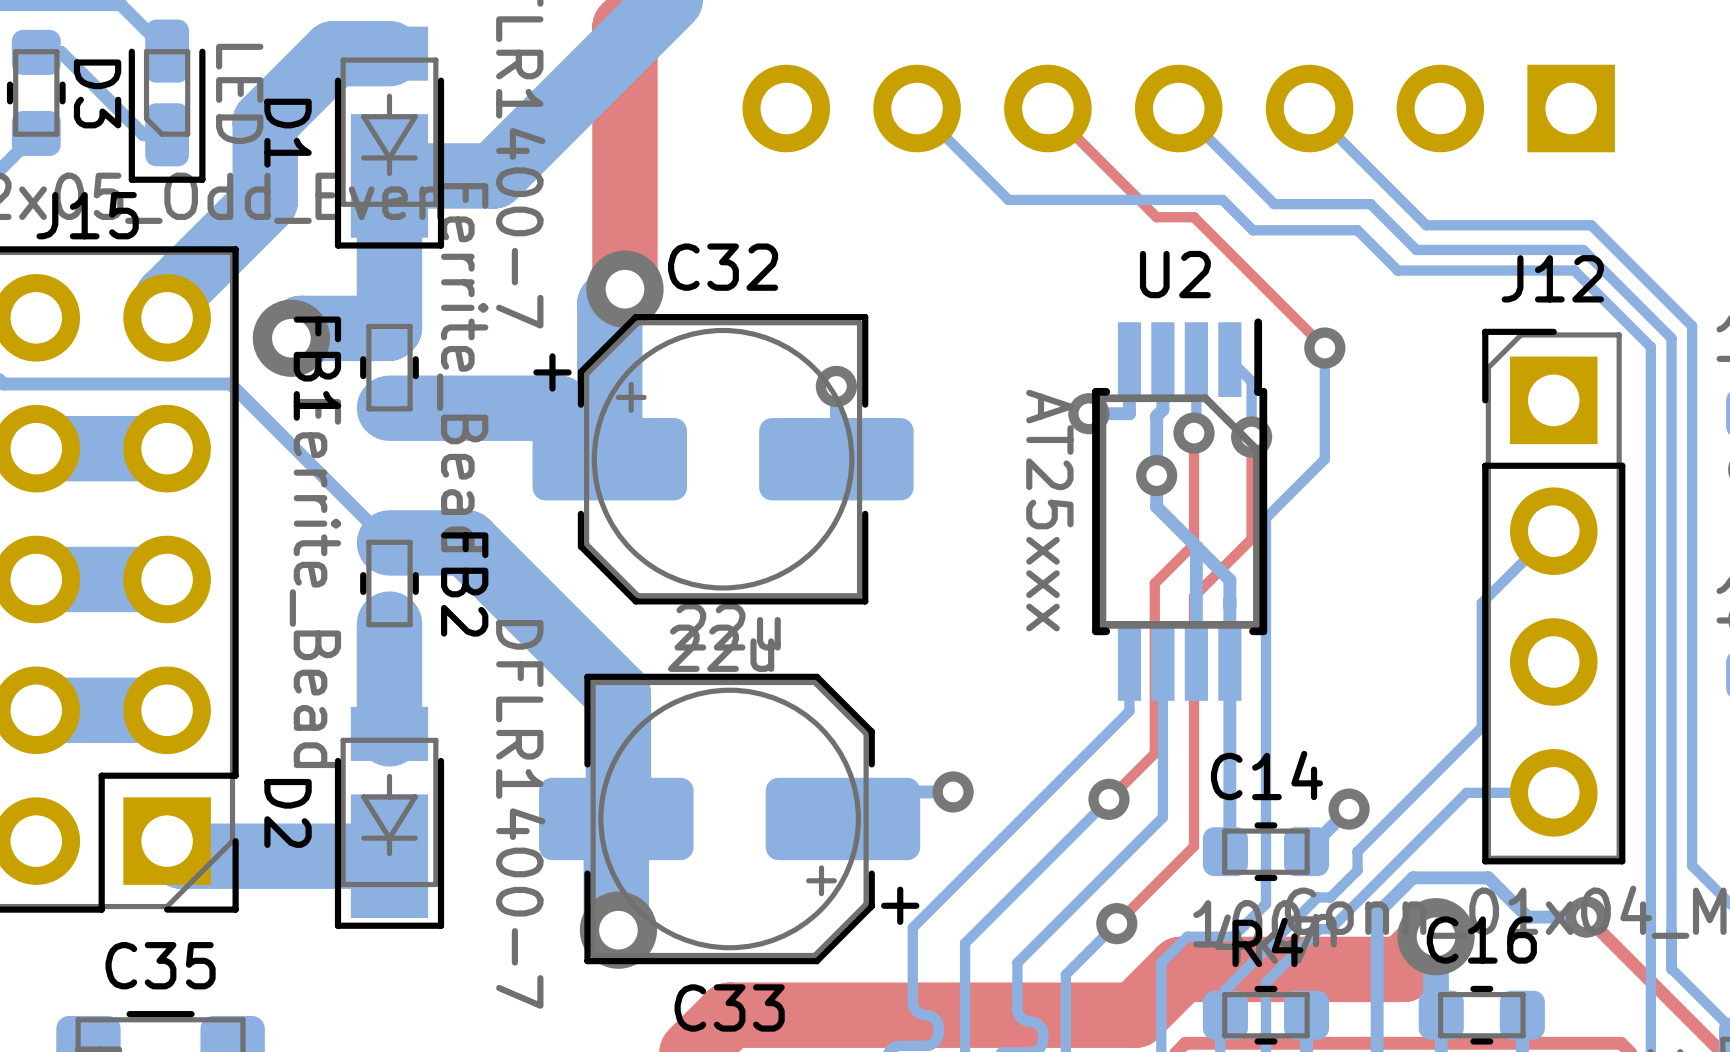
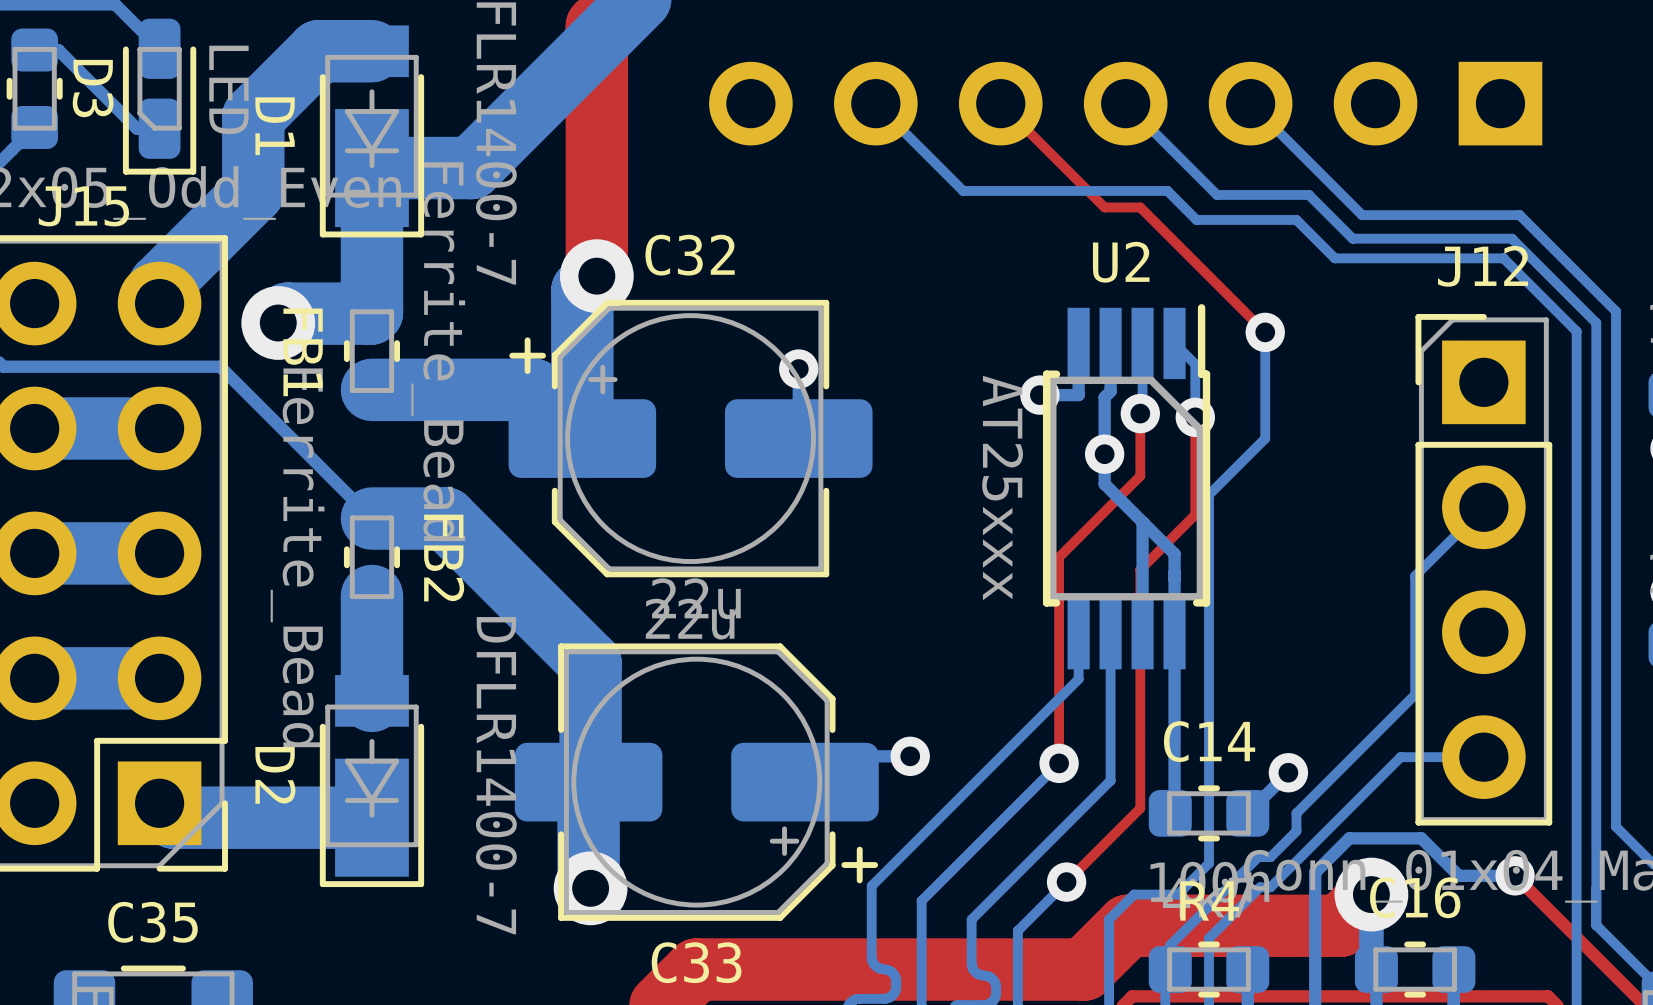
top track: (1194, 498) (1194, 544) (1154, 583) (1154, 753) (1108, 799) -> (1140, 476) (1059, 557) (1059, 763)

